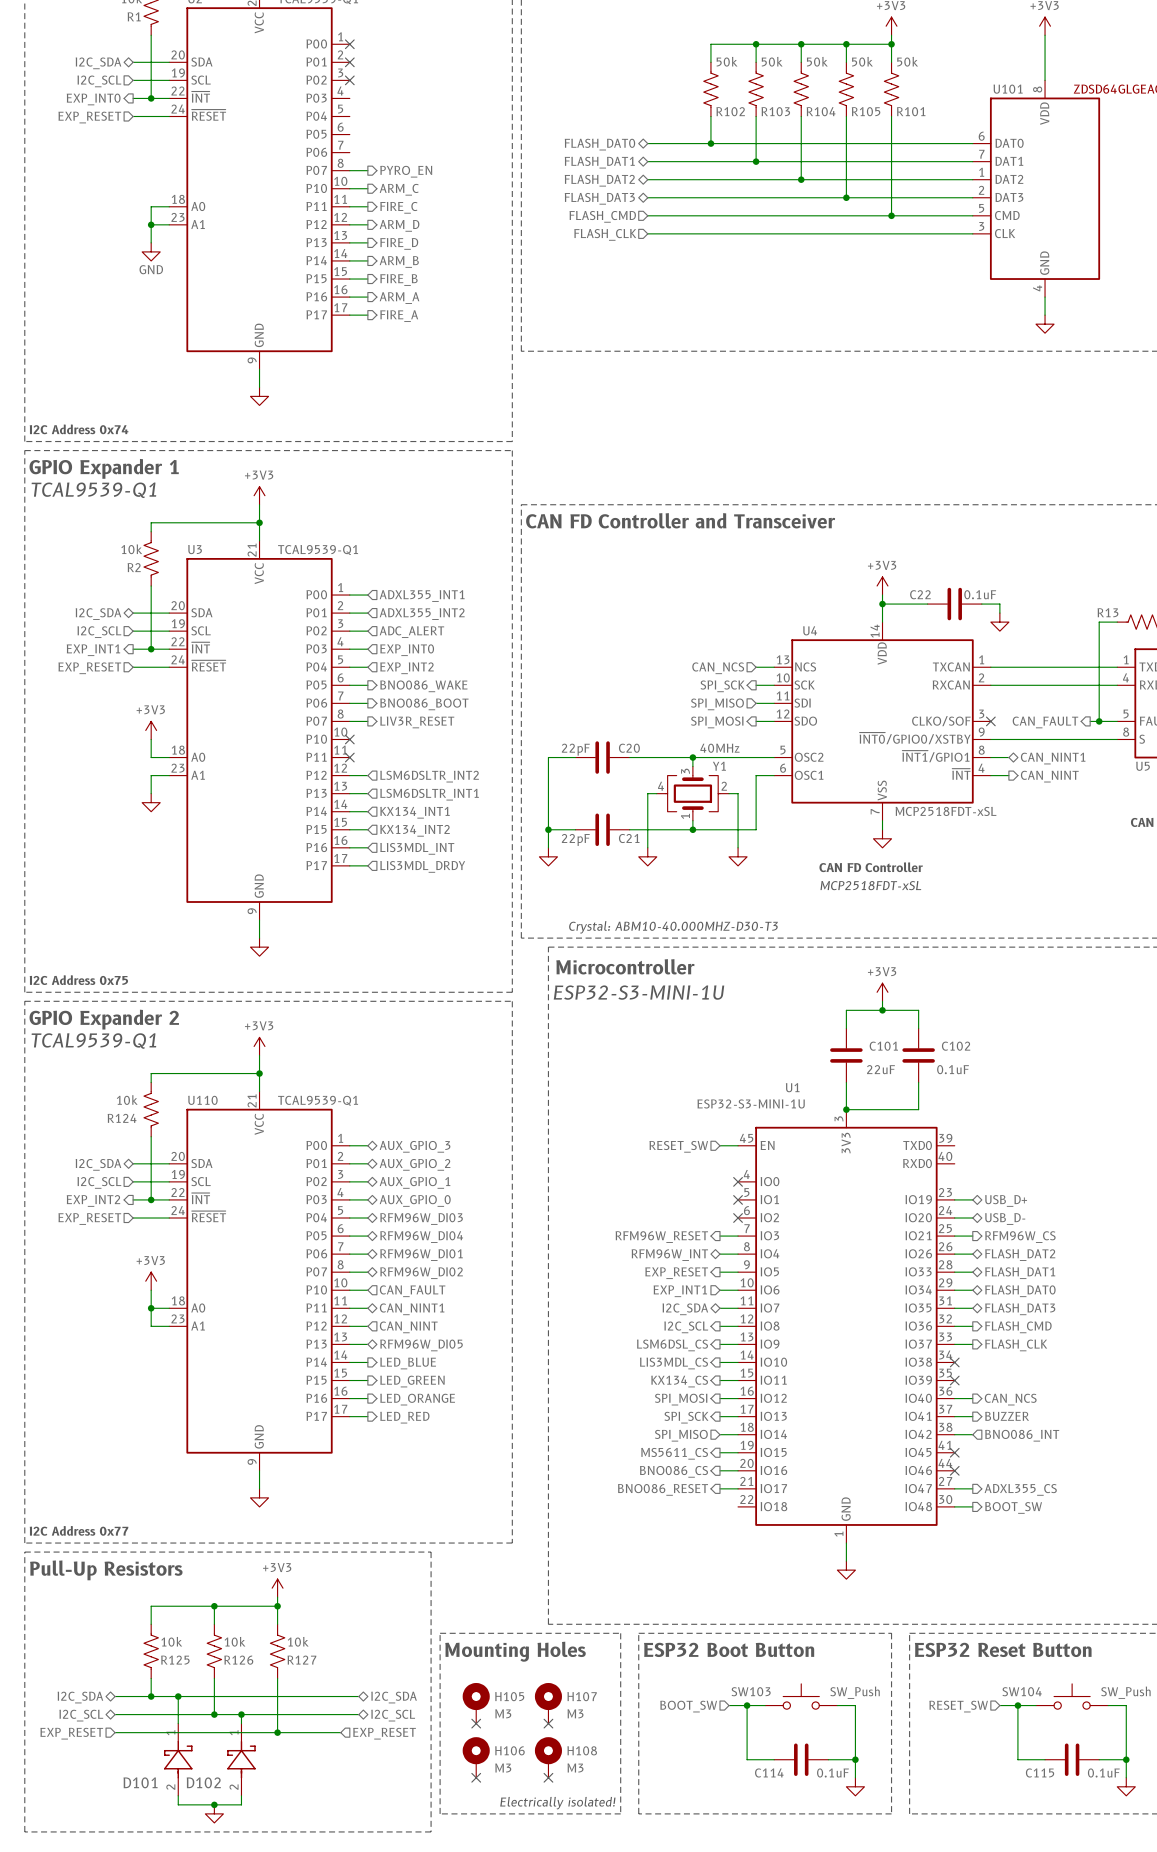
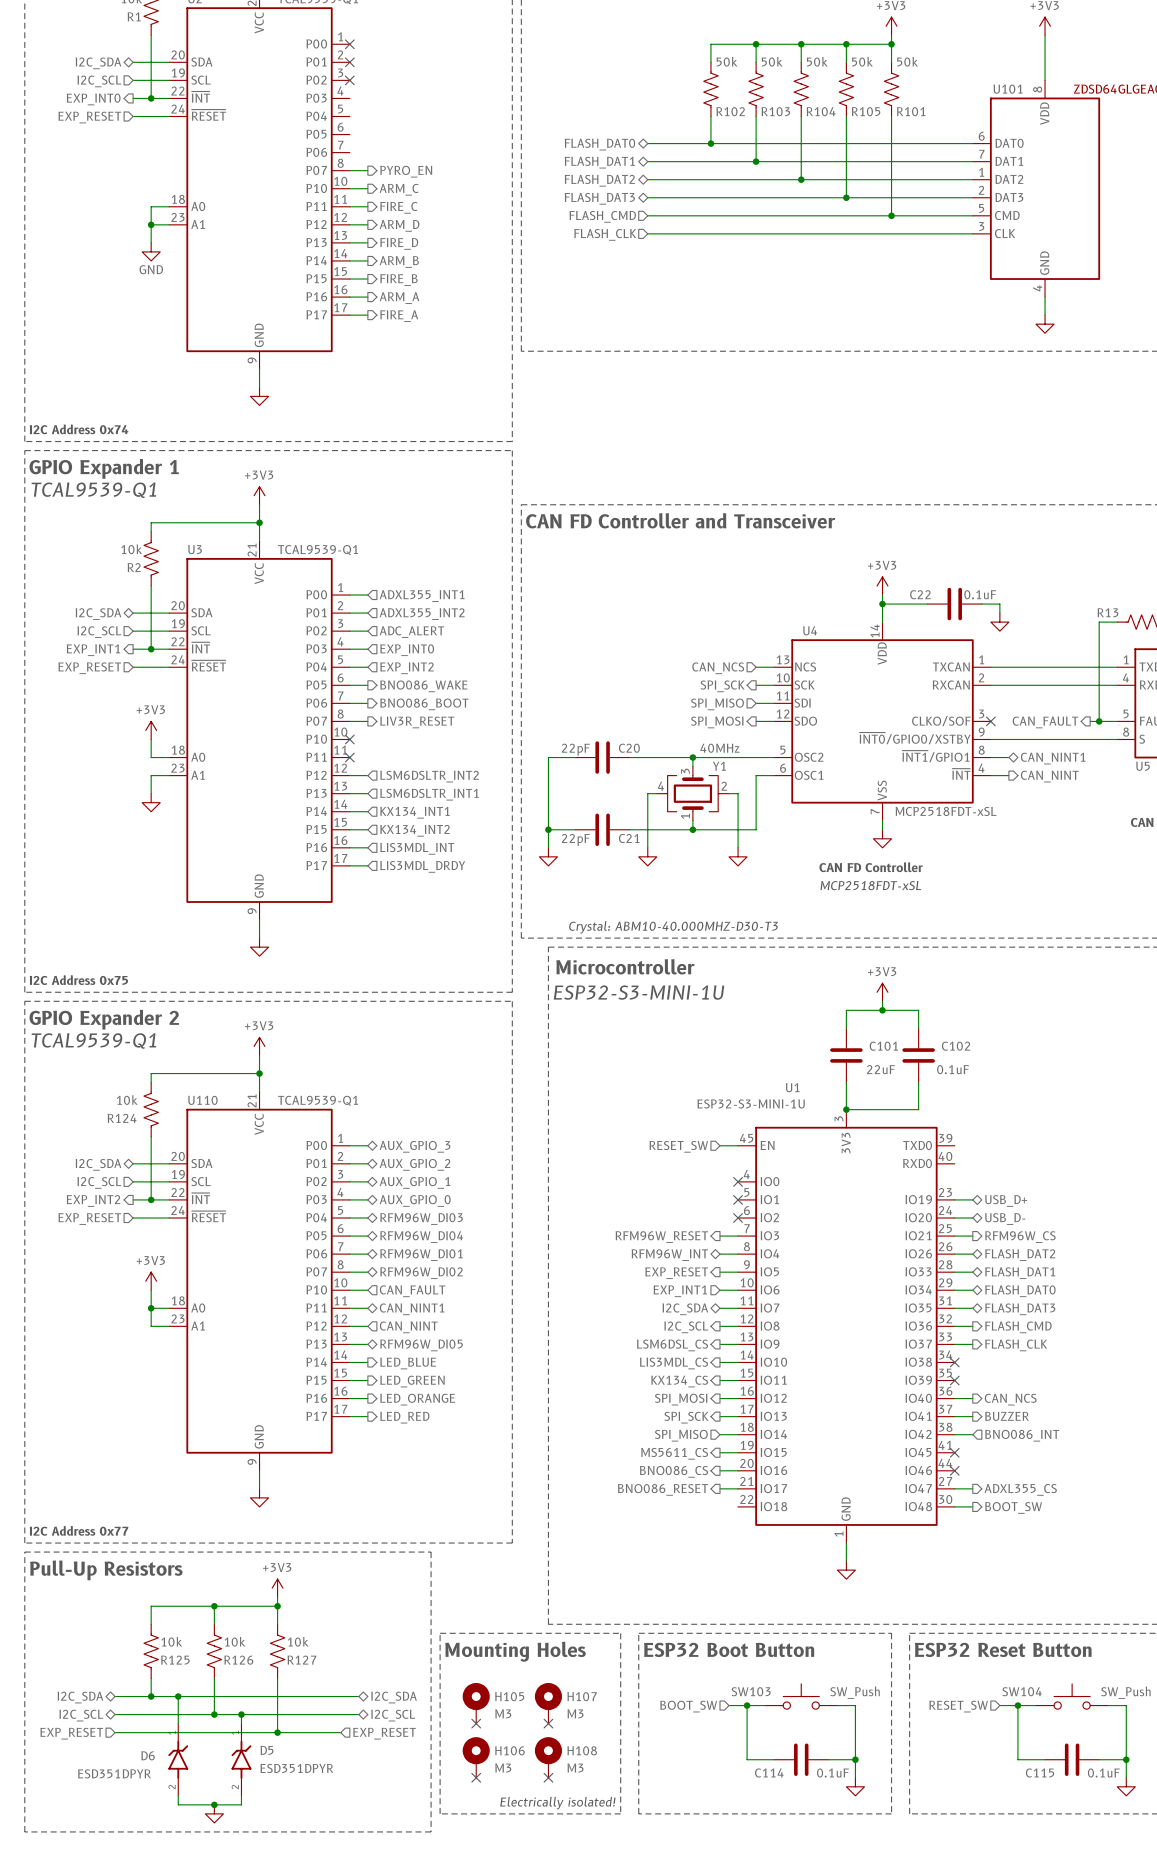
D101: (178, 1759) -> none
D6: none -> ESD351DPYR (178, 1759)
D102: (241, 1759) -> none
D5: none -> ESD351DPYR (241, 1759)

